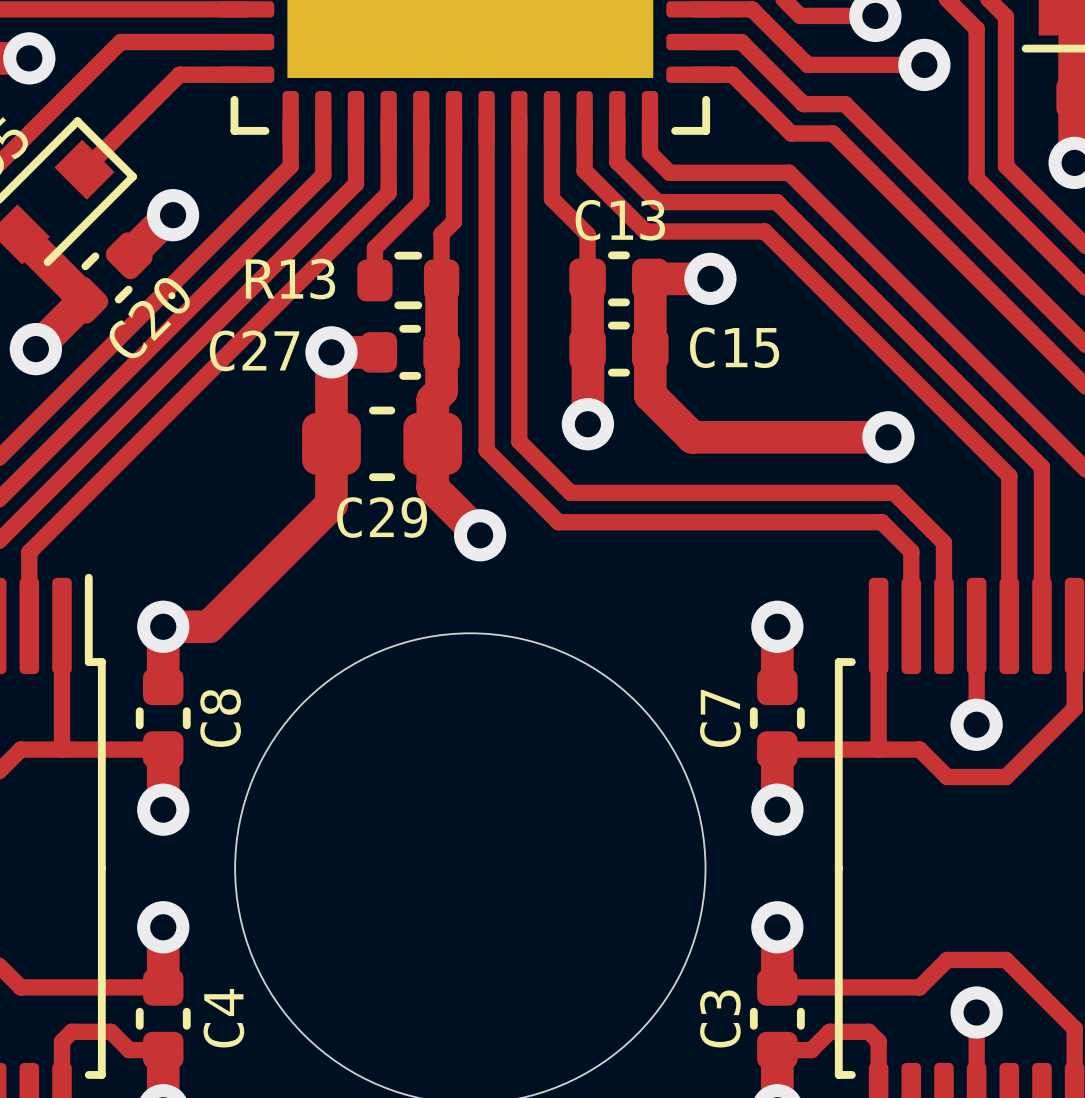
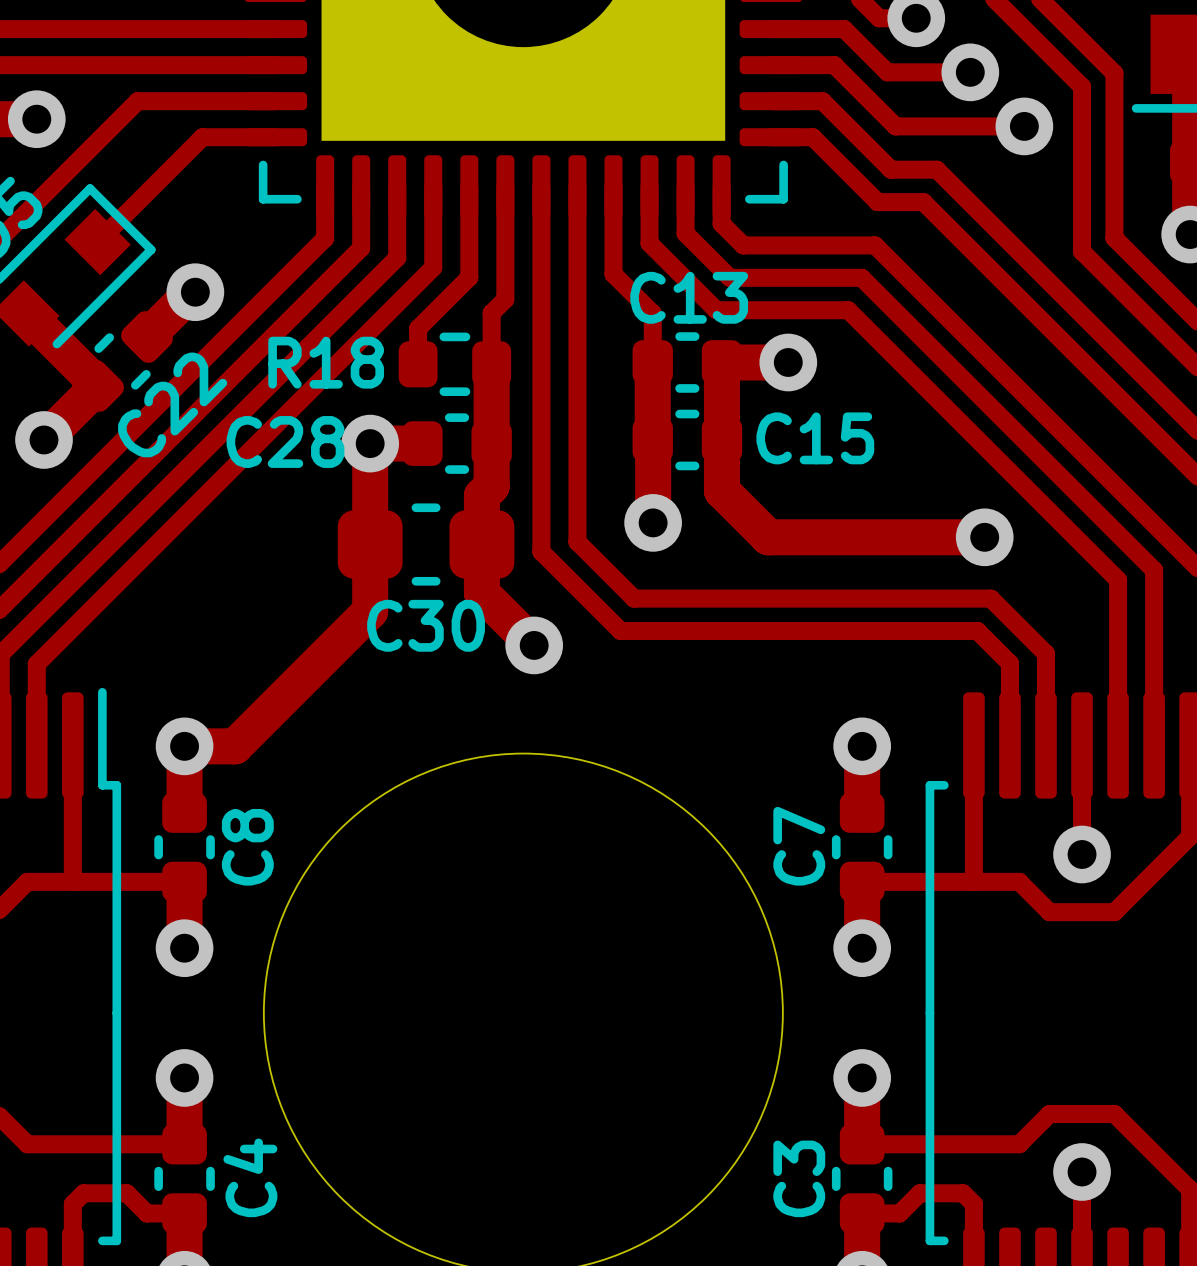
R13 name: R13 (290, 279) -> R18 (326, 362)
C20 name: C20 (149, 317) -> C22 (172, 404)
C27 name: C27 (254, 350) -> C28 (285, 441)
C29 name: C29 (382, 517) -> C30 (426, 625)

